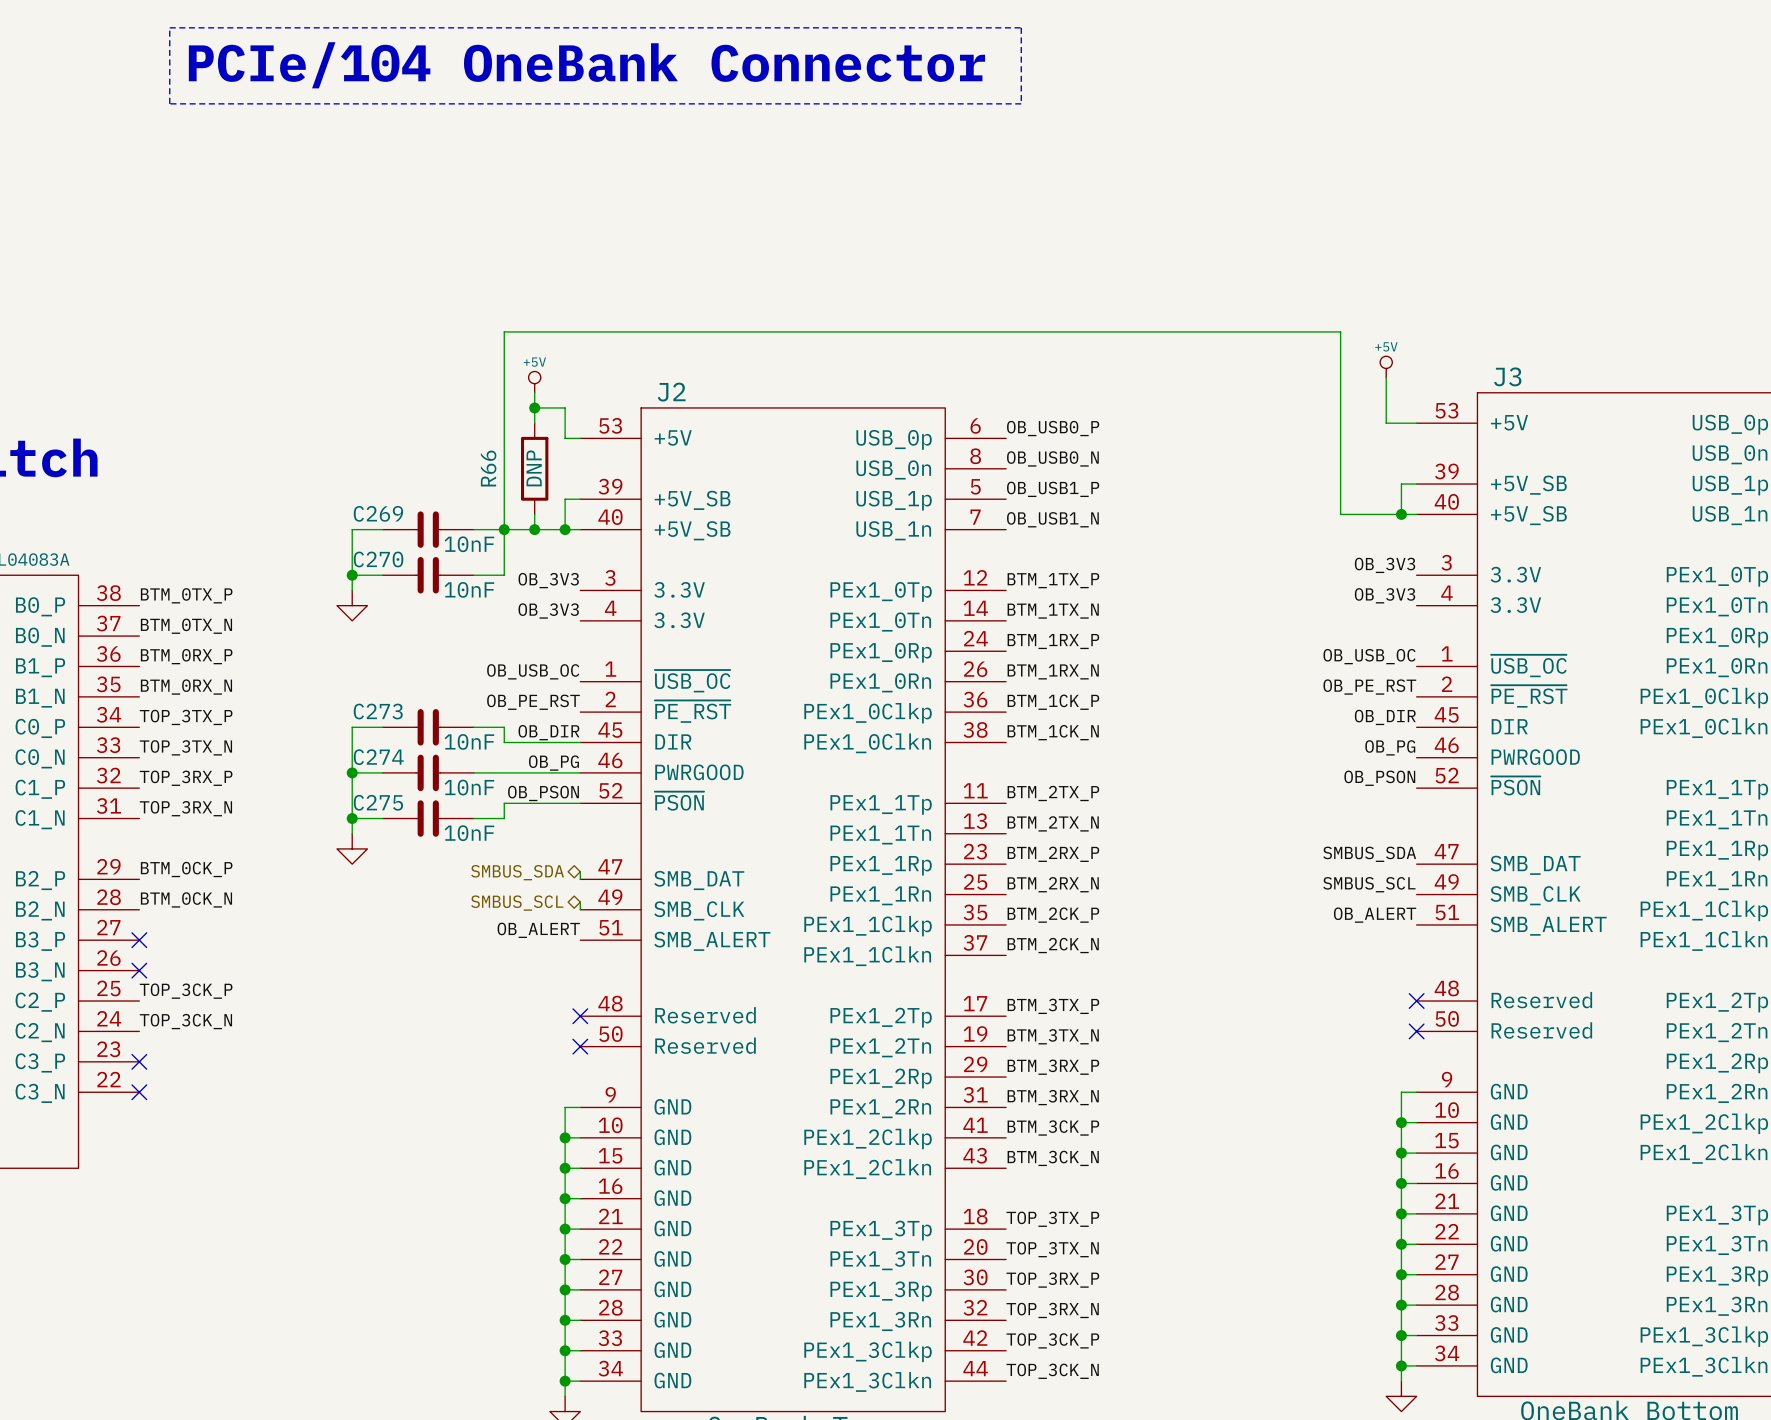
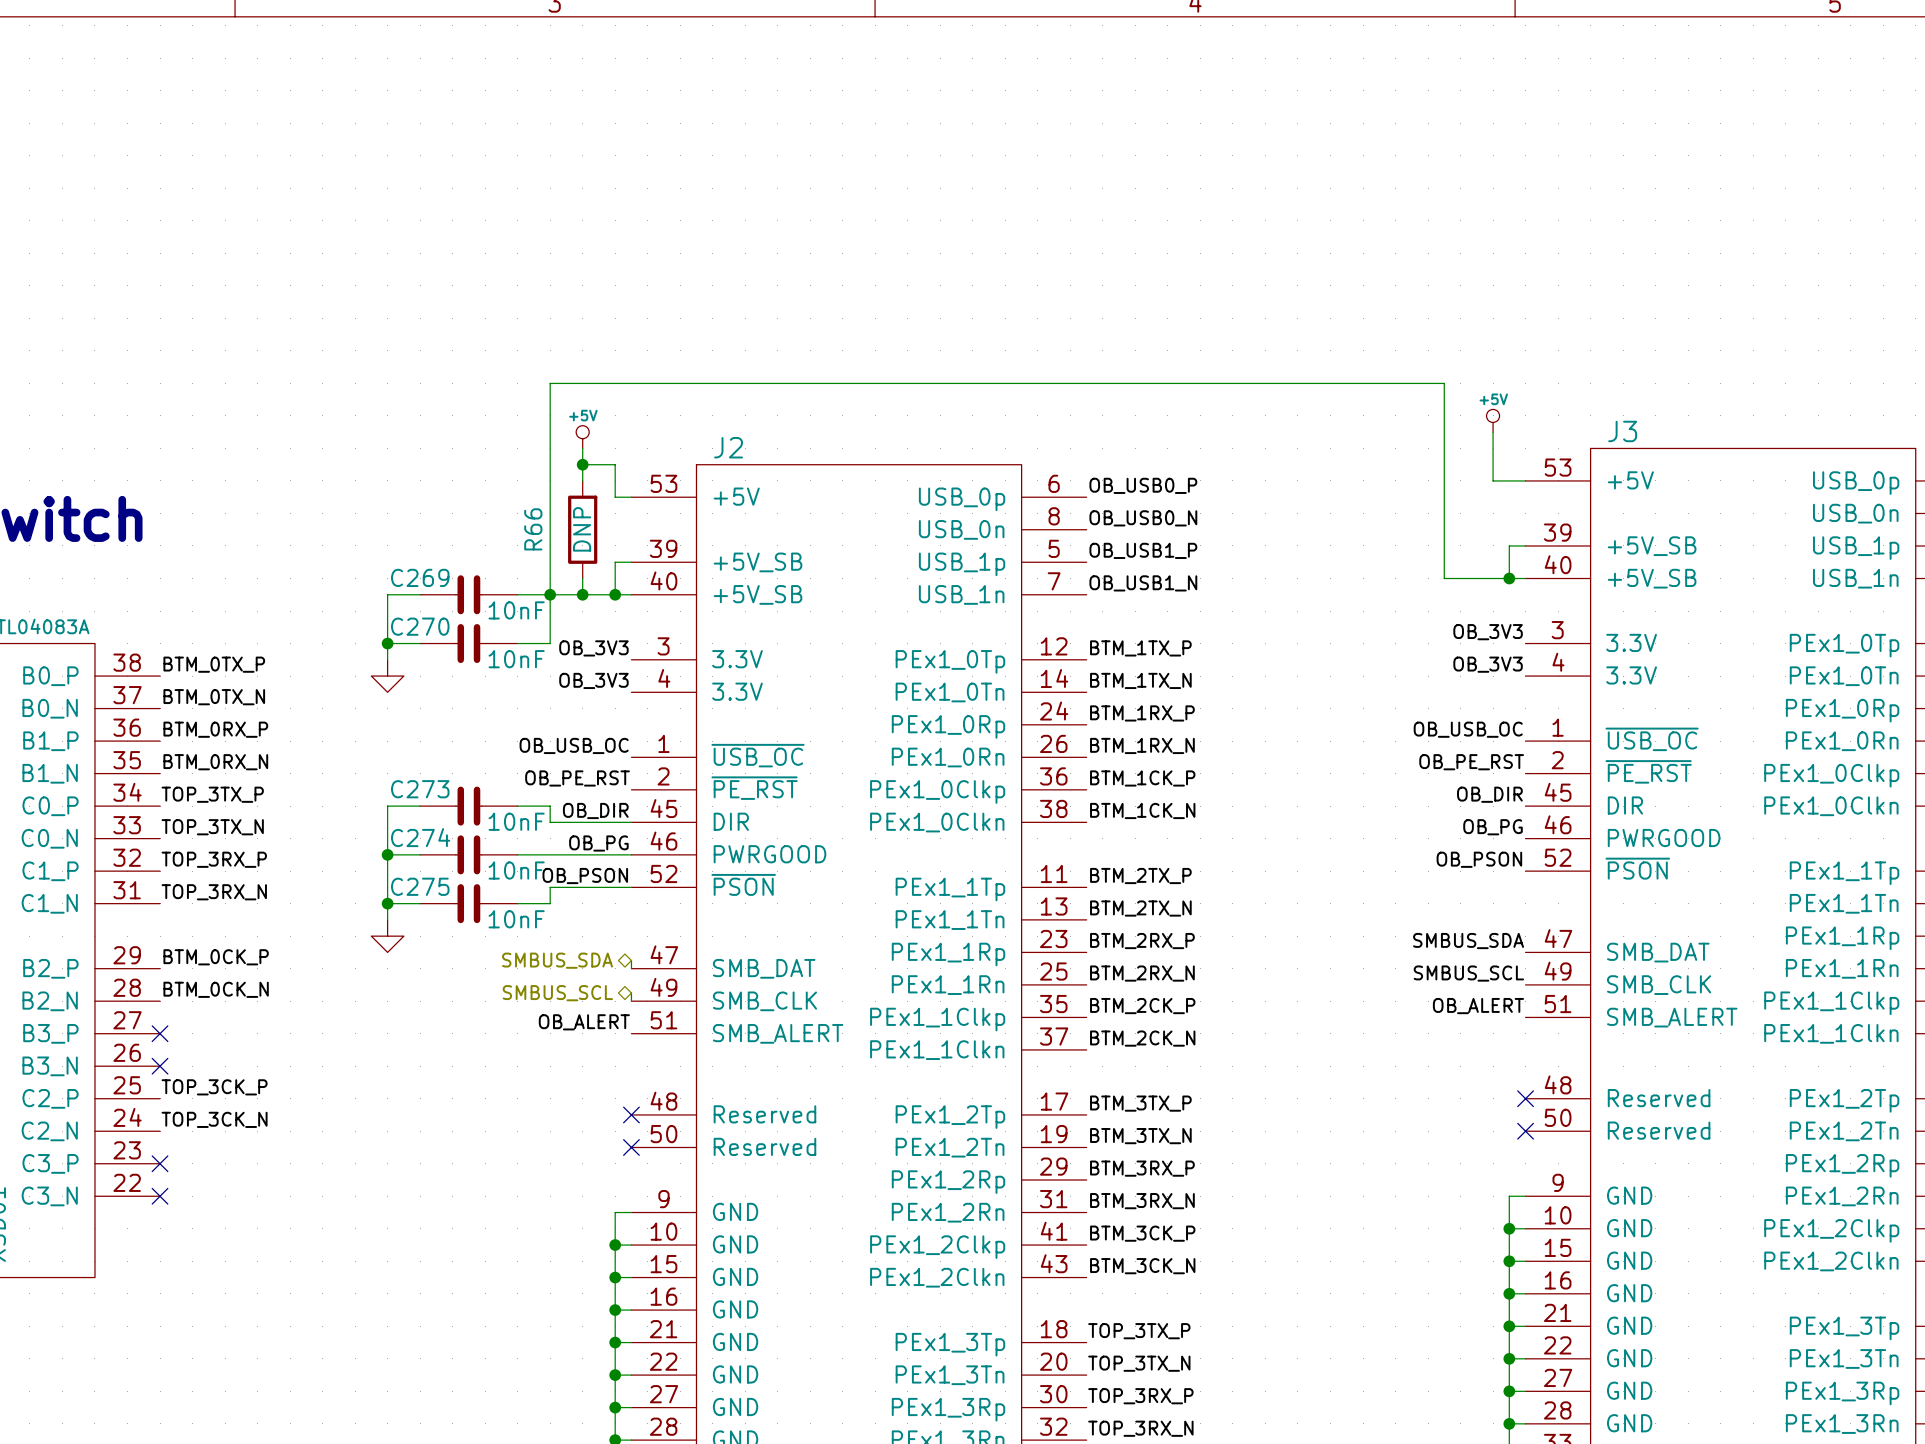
line: (169, 27) (1021, 27) (1021, 103) (169, 103) (169, 27) -> none
text: PCIe/104 OneBank Connector (586, 65) -> none

